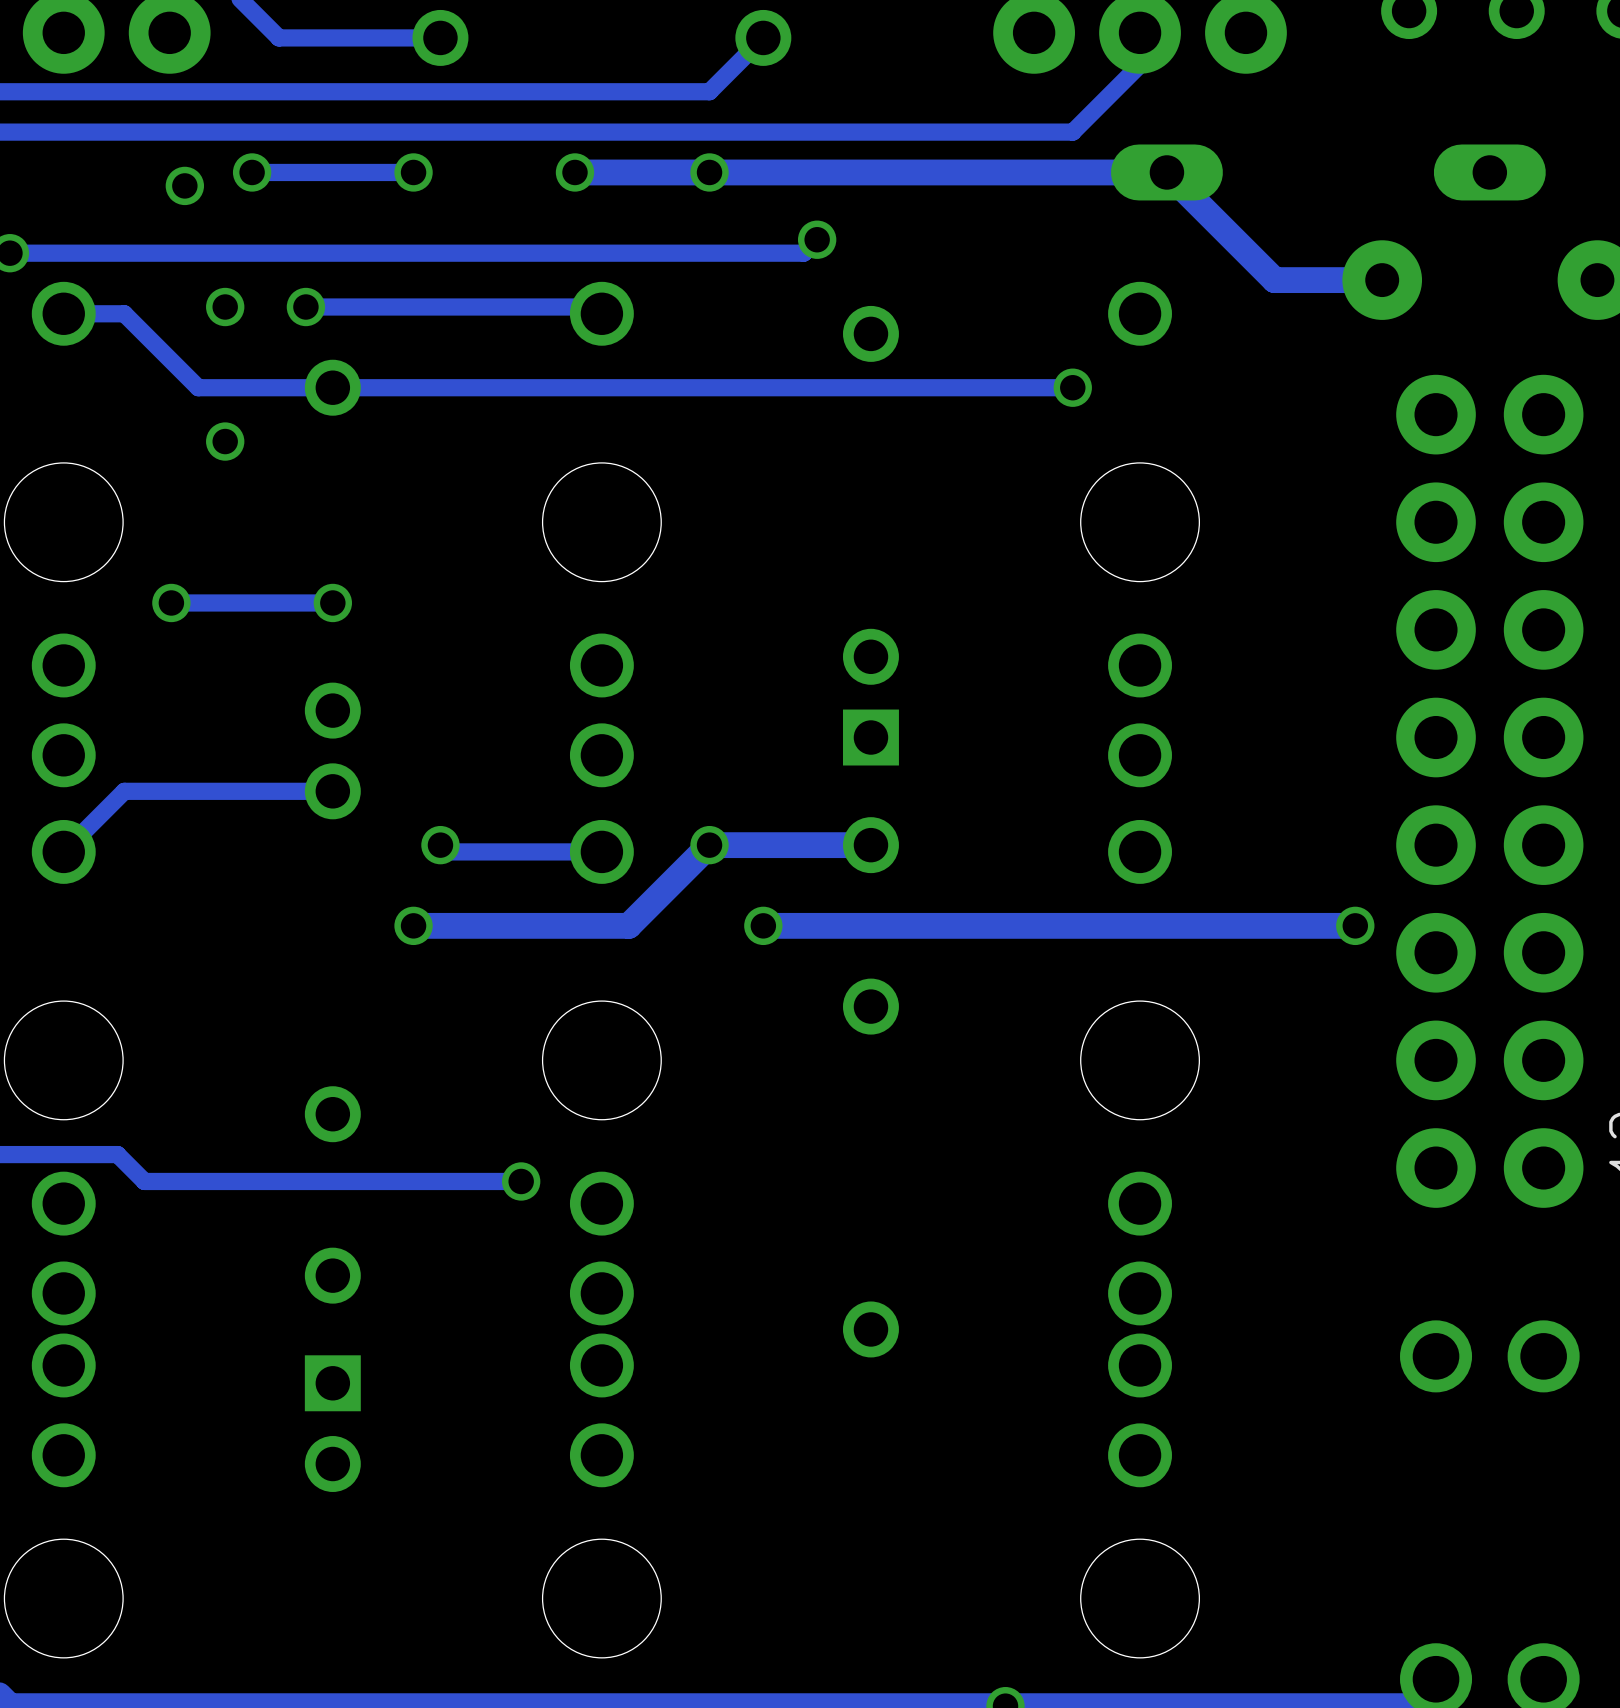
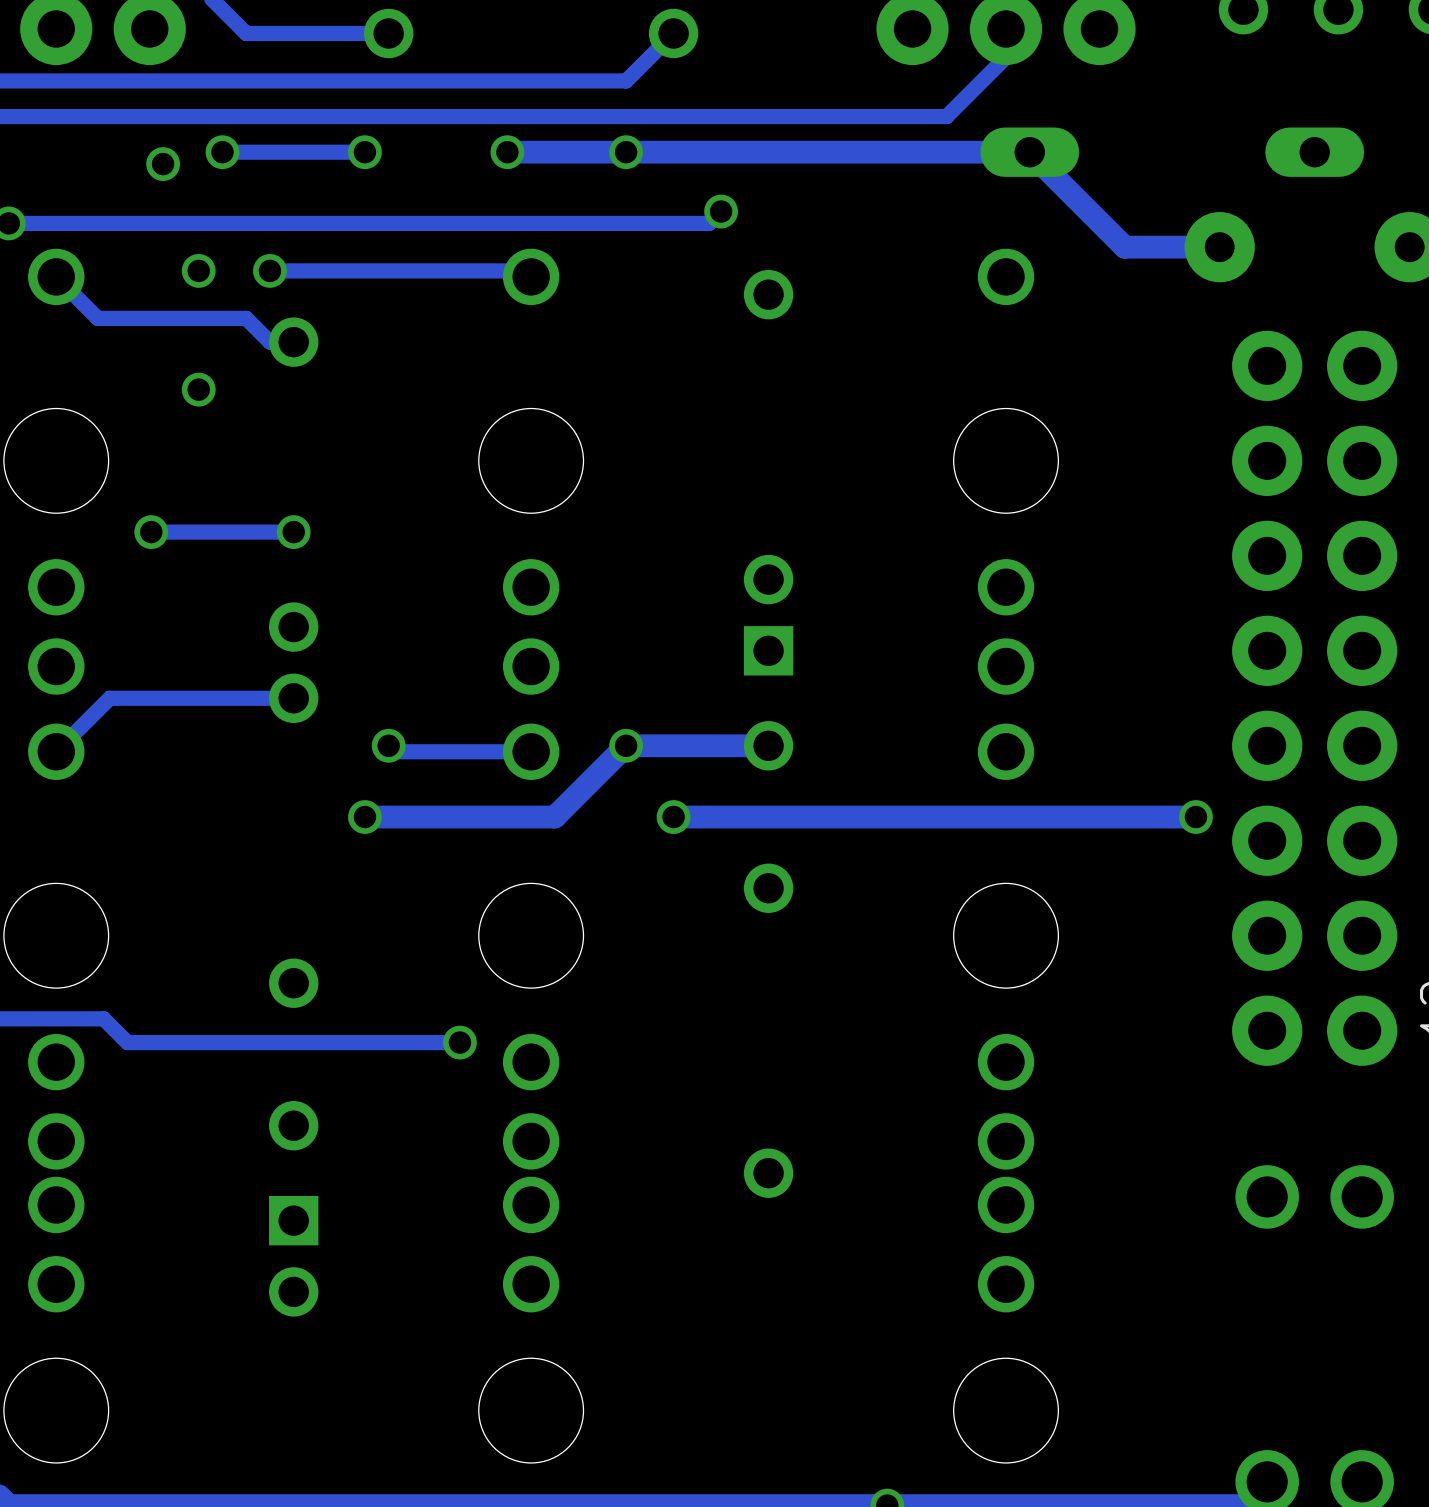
track: (63, 313) (124, 313) (198, 387) (305, 387) -> (56, 276) (97, 318) (246, 318) (269, 342)
track: (1072, 387) (332, 387) -> none
via: (1072, 387) -> none

